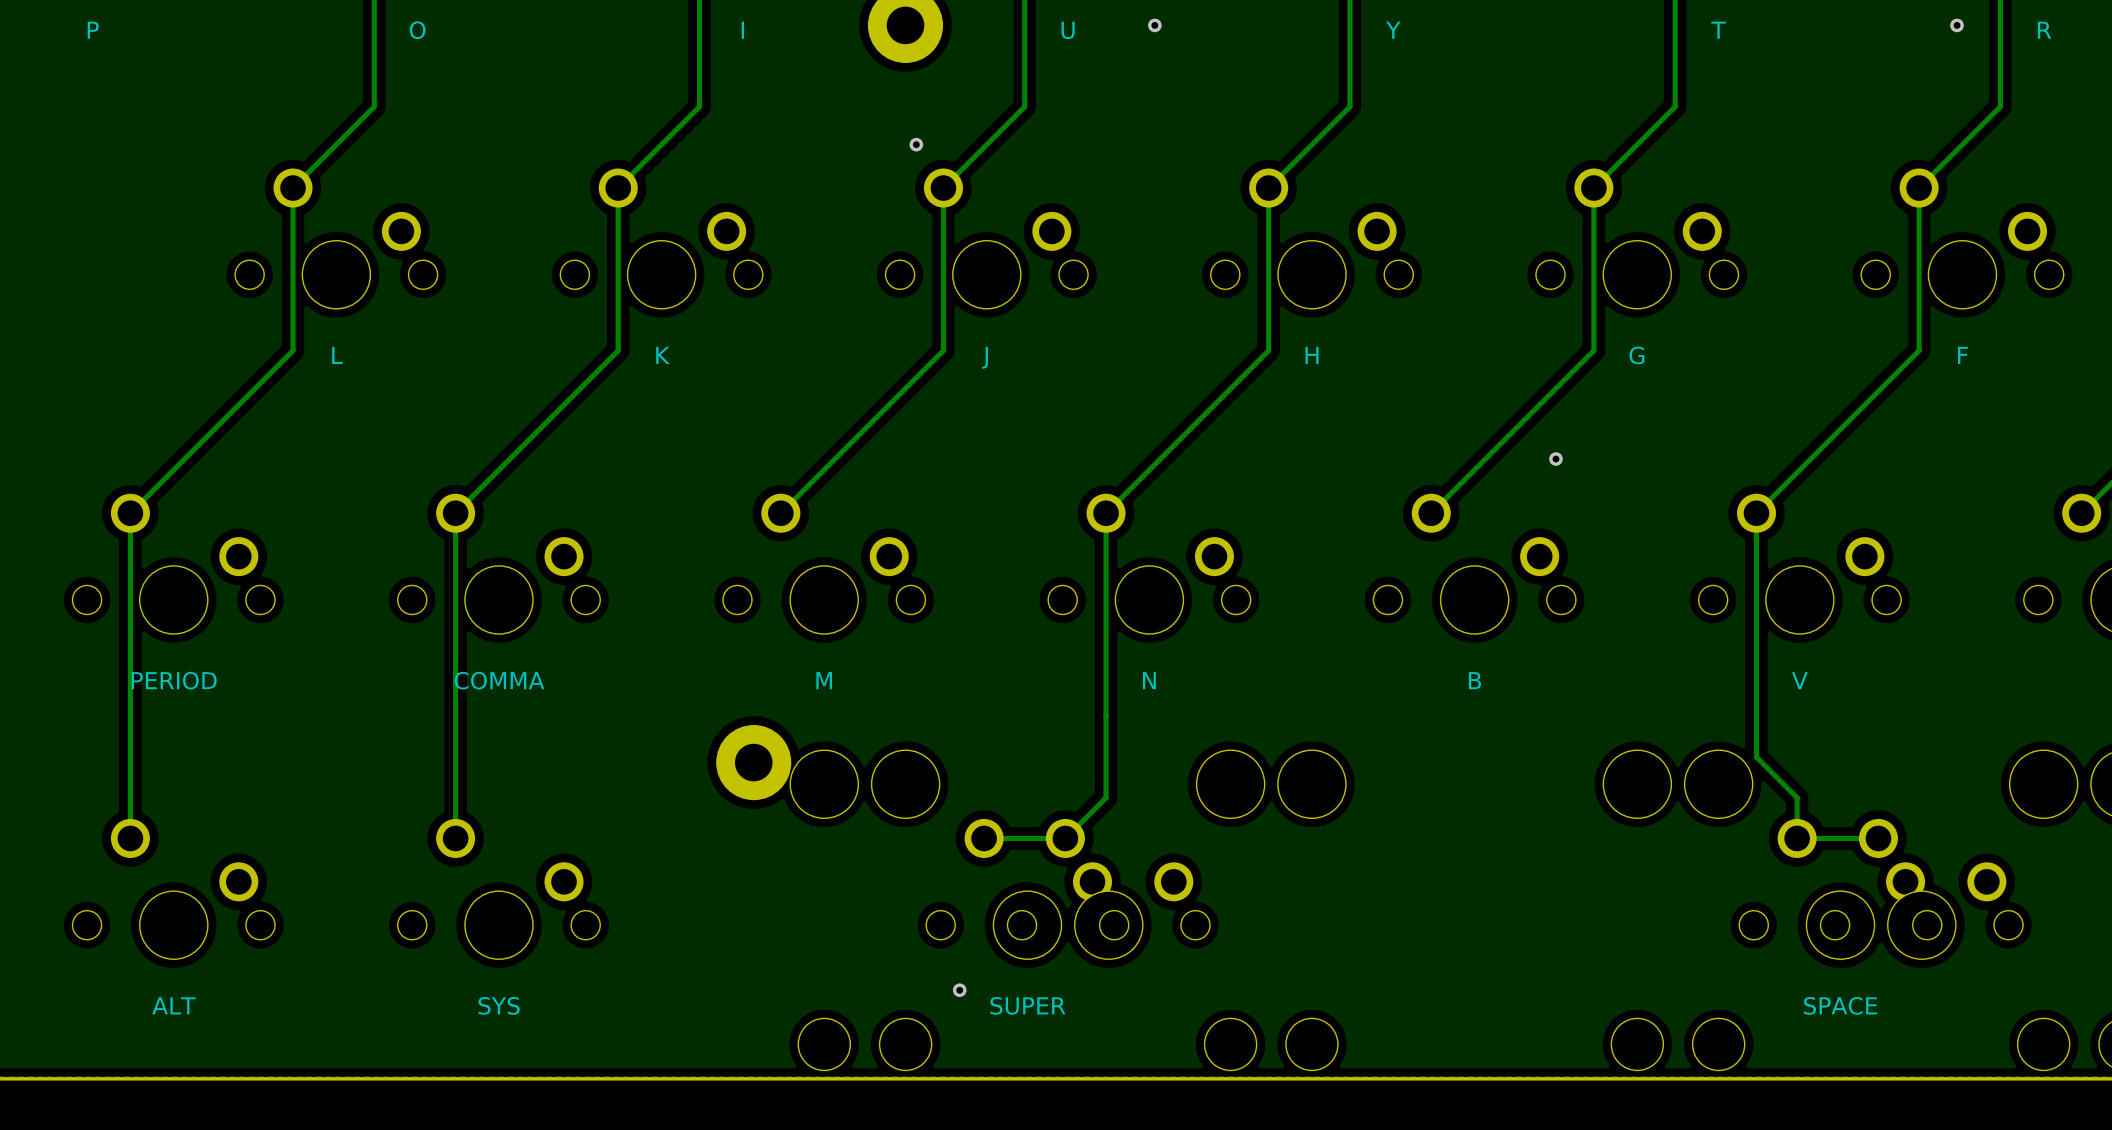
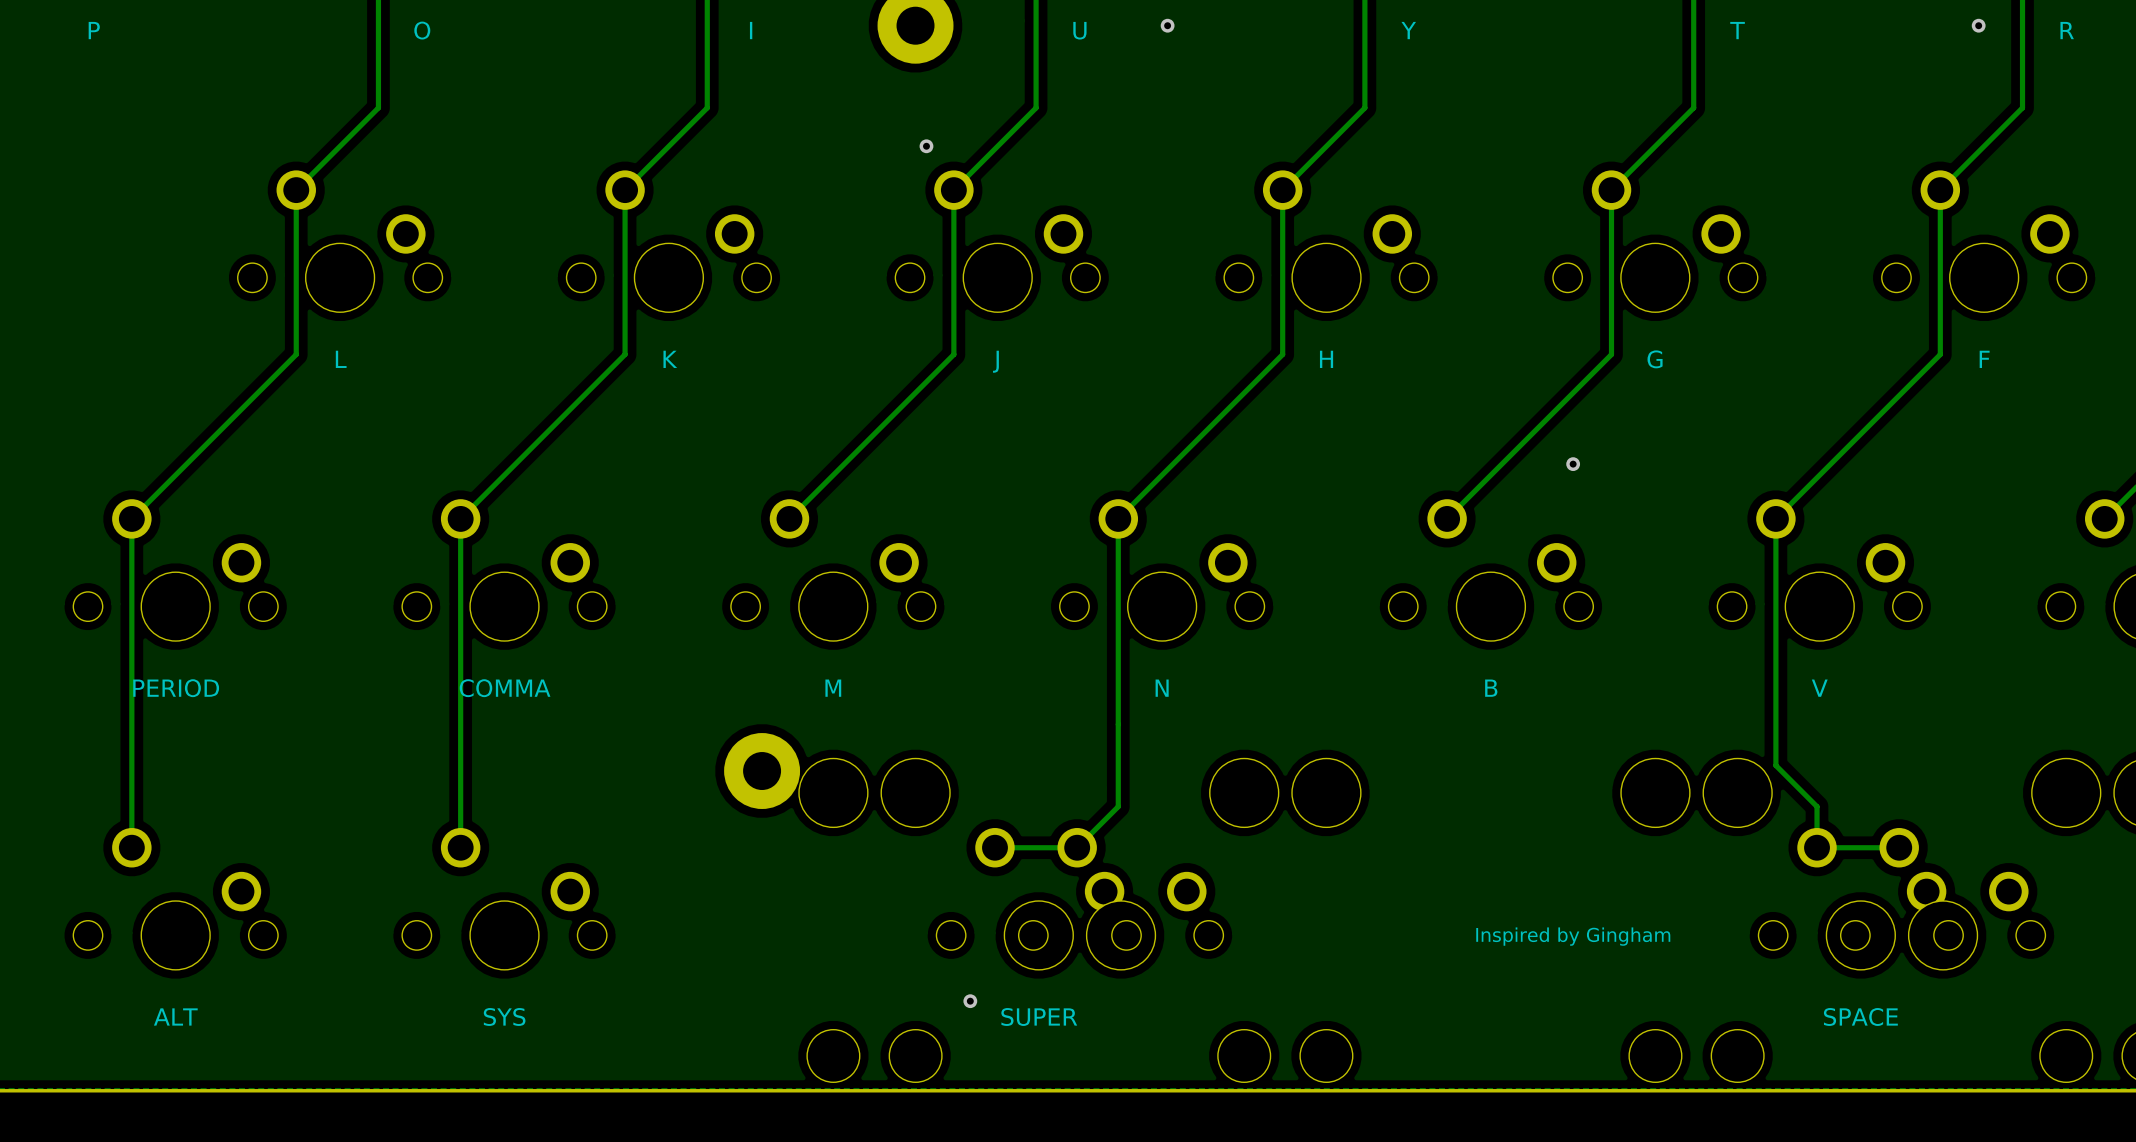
text: none -> Inspired by Gingham (1573, 936)

